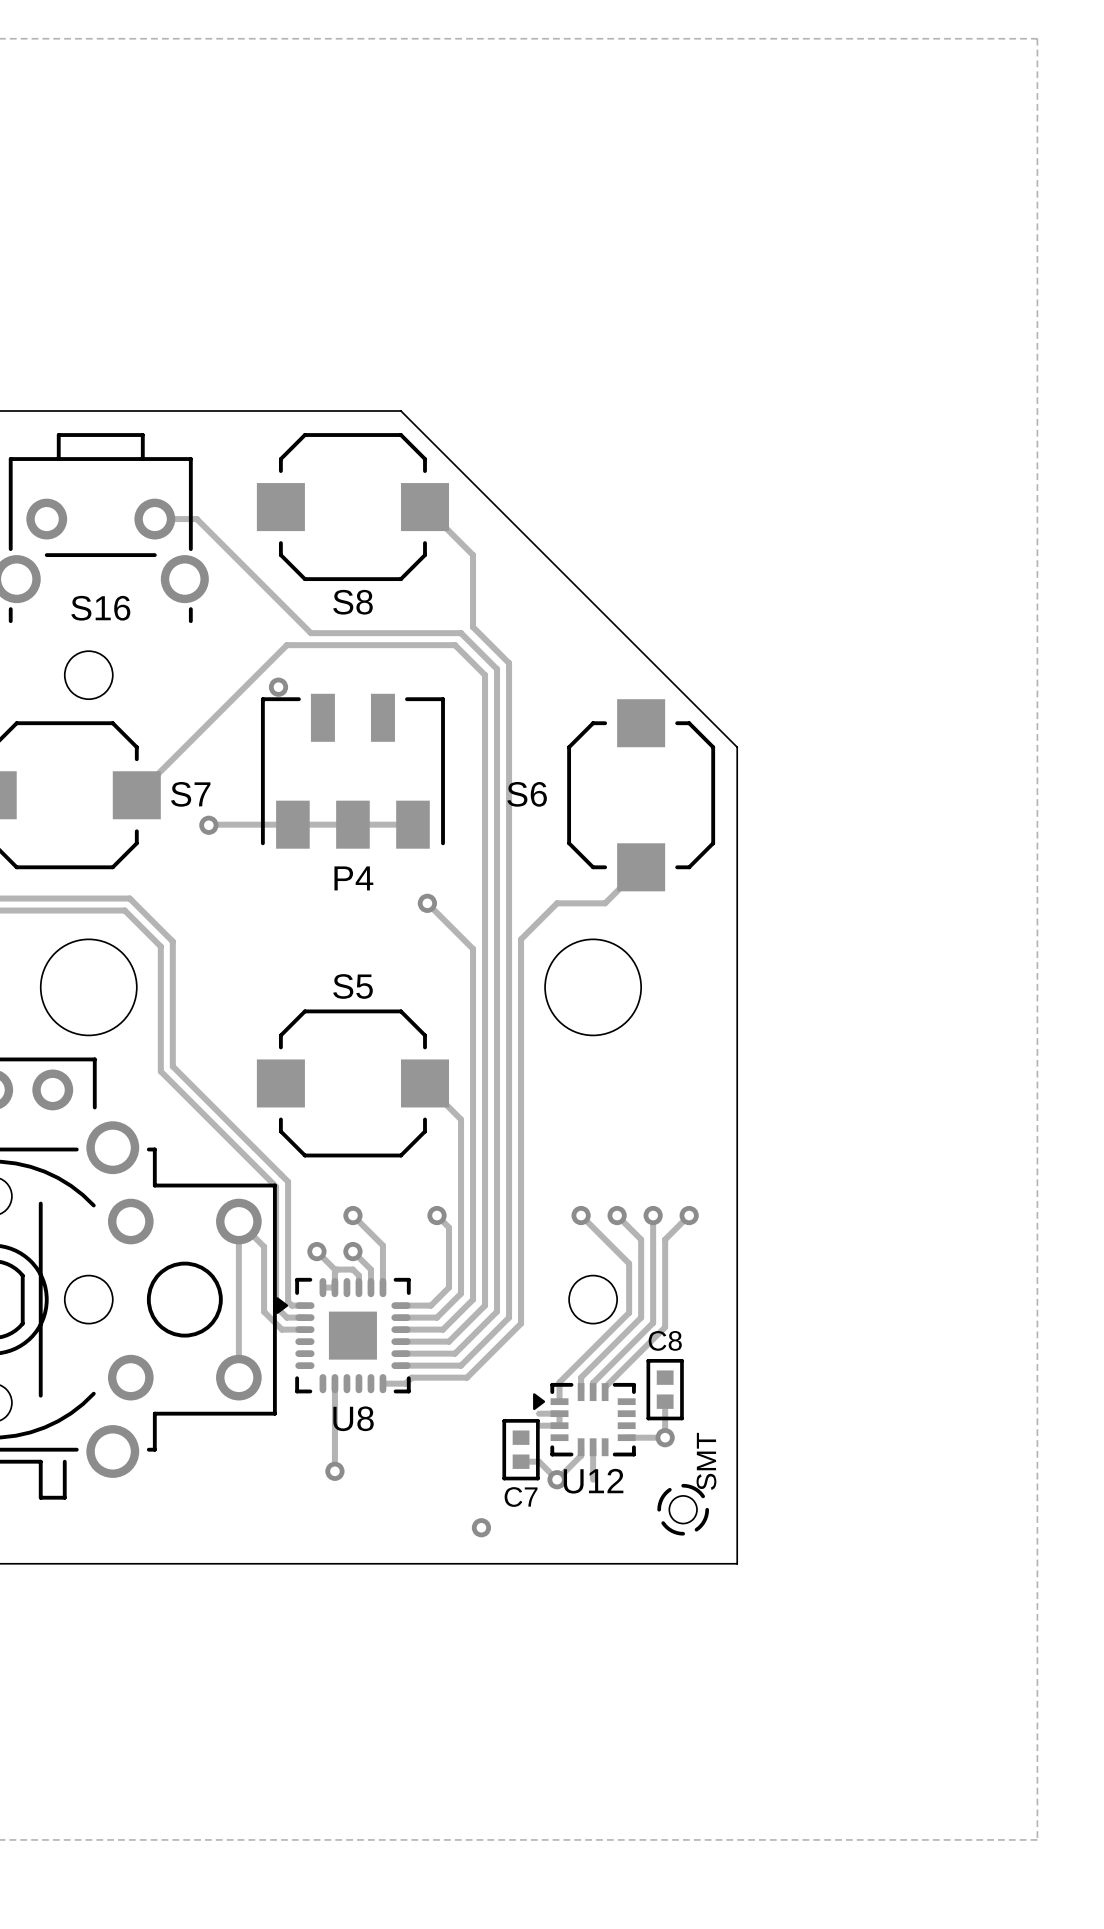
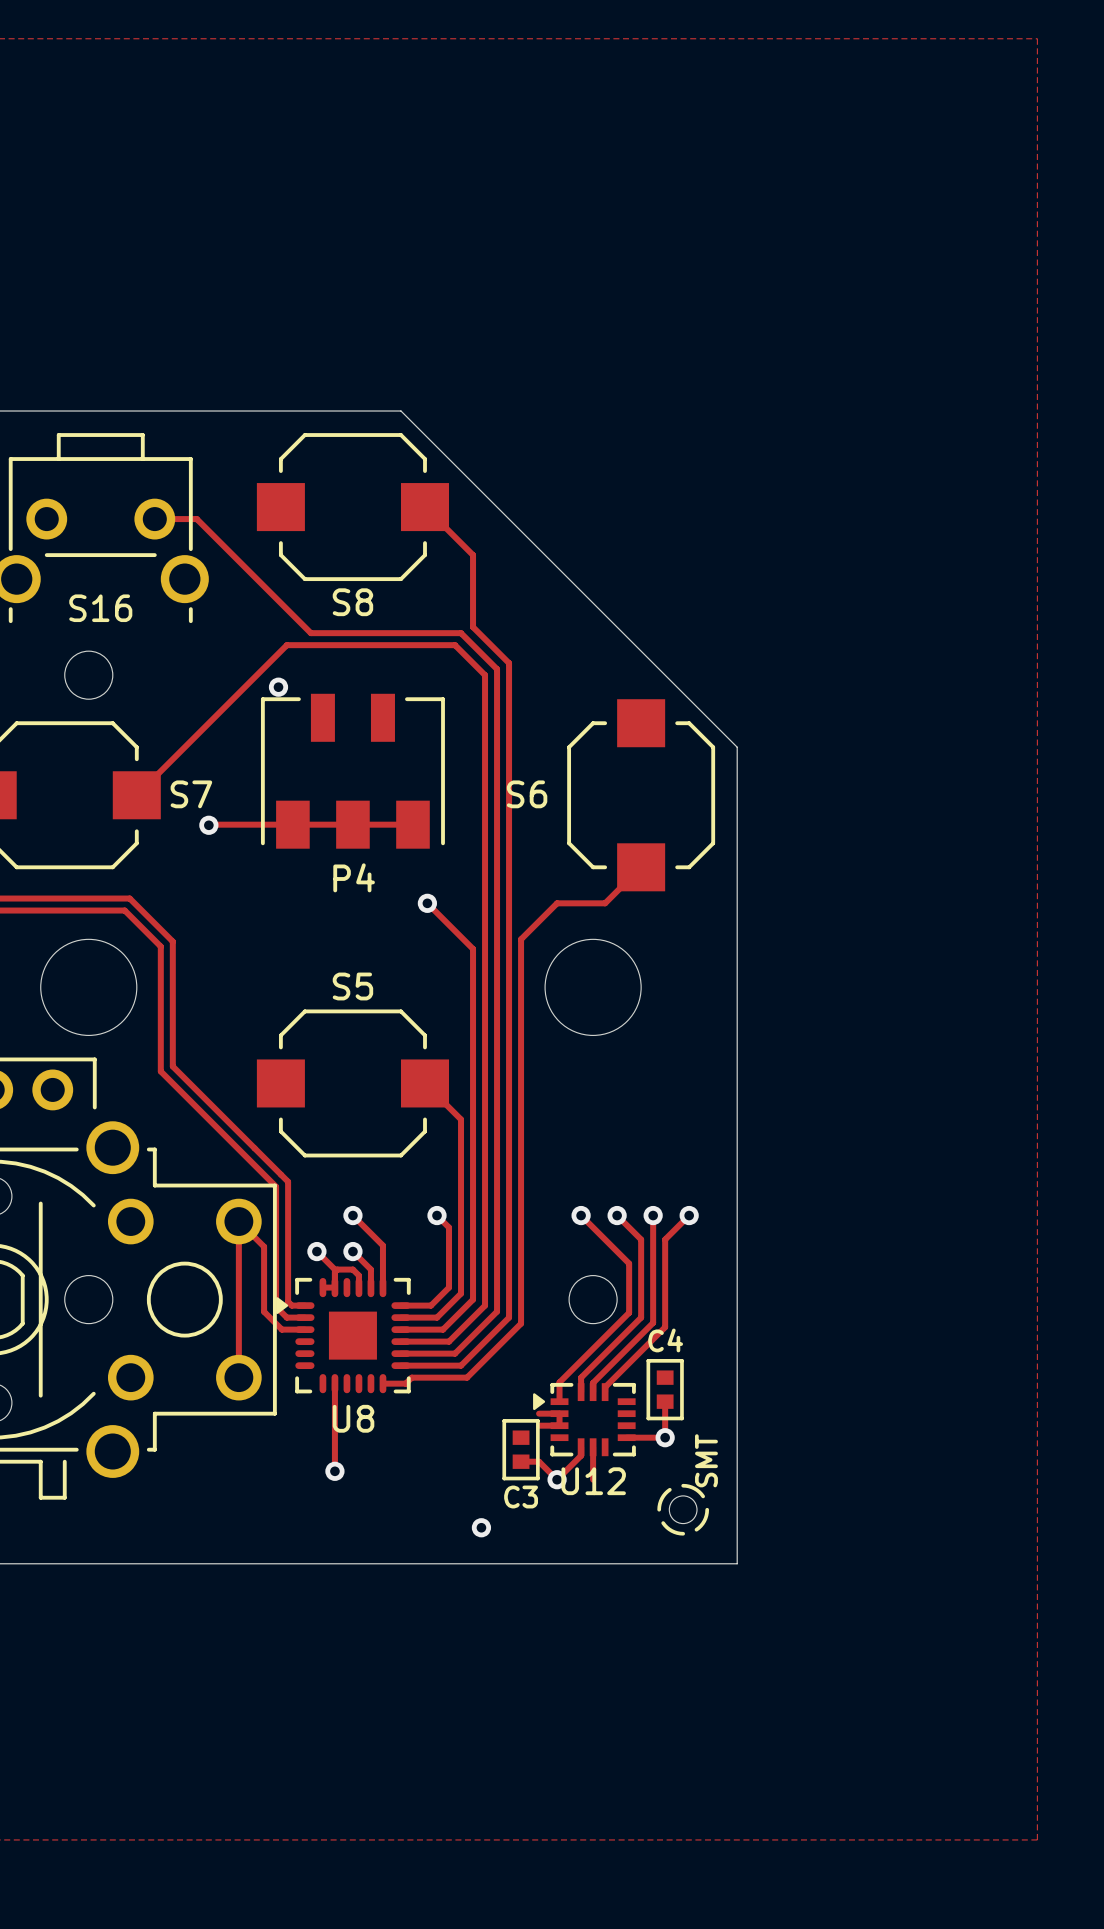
C8 name: C8 (665, 1340) -> C4 (665, 1340)
C7 name: C7 (521, 1497) -> C3 (521, 1497)

